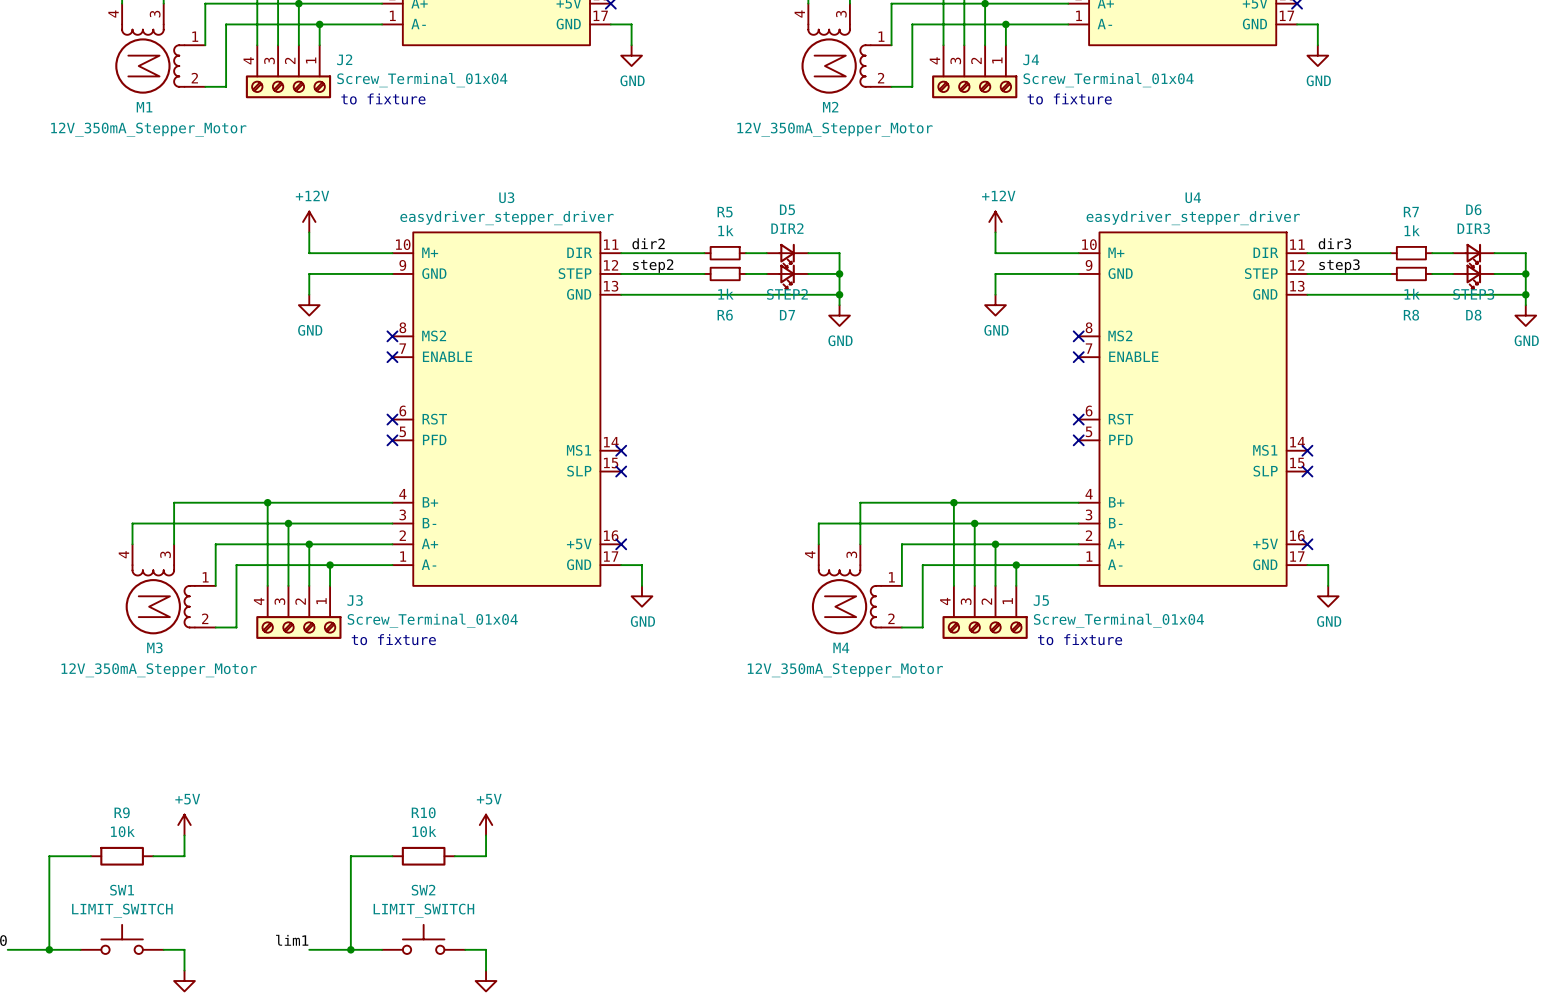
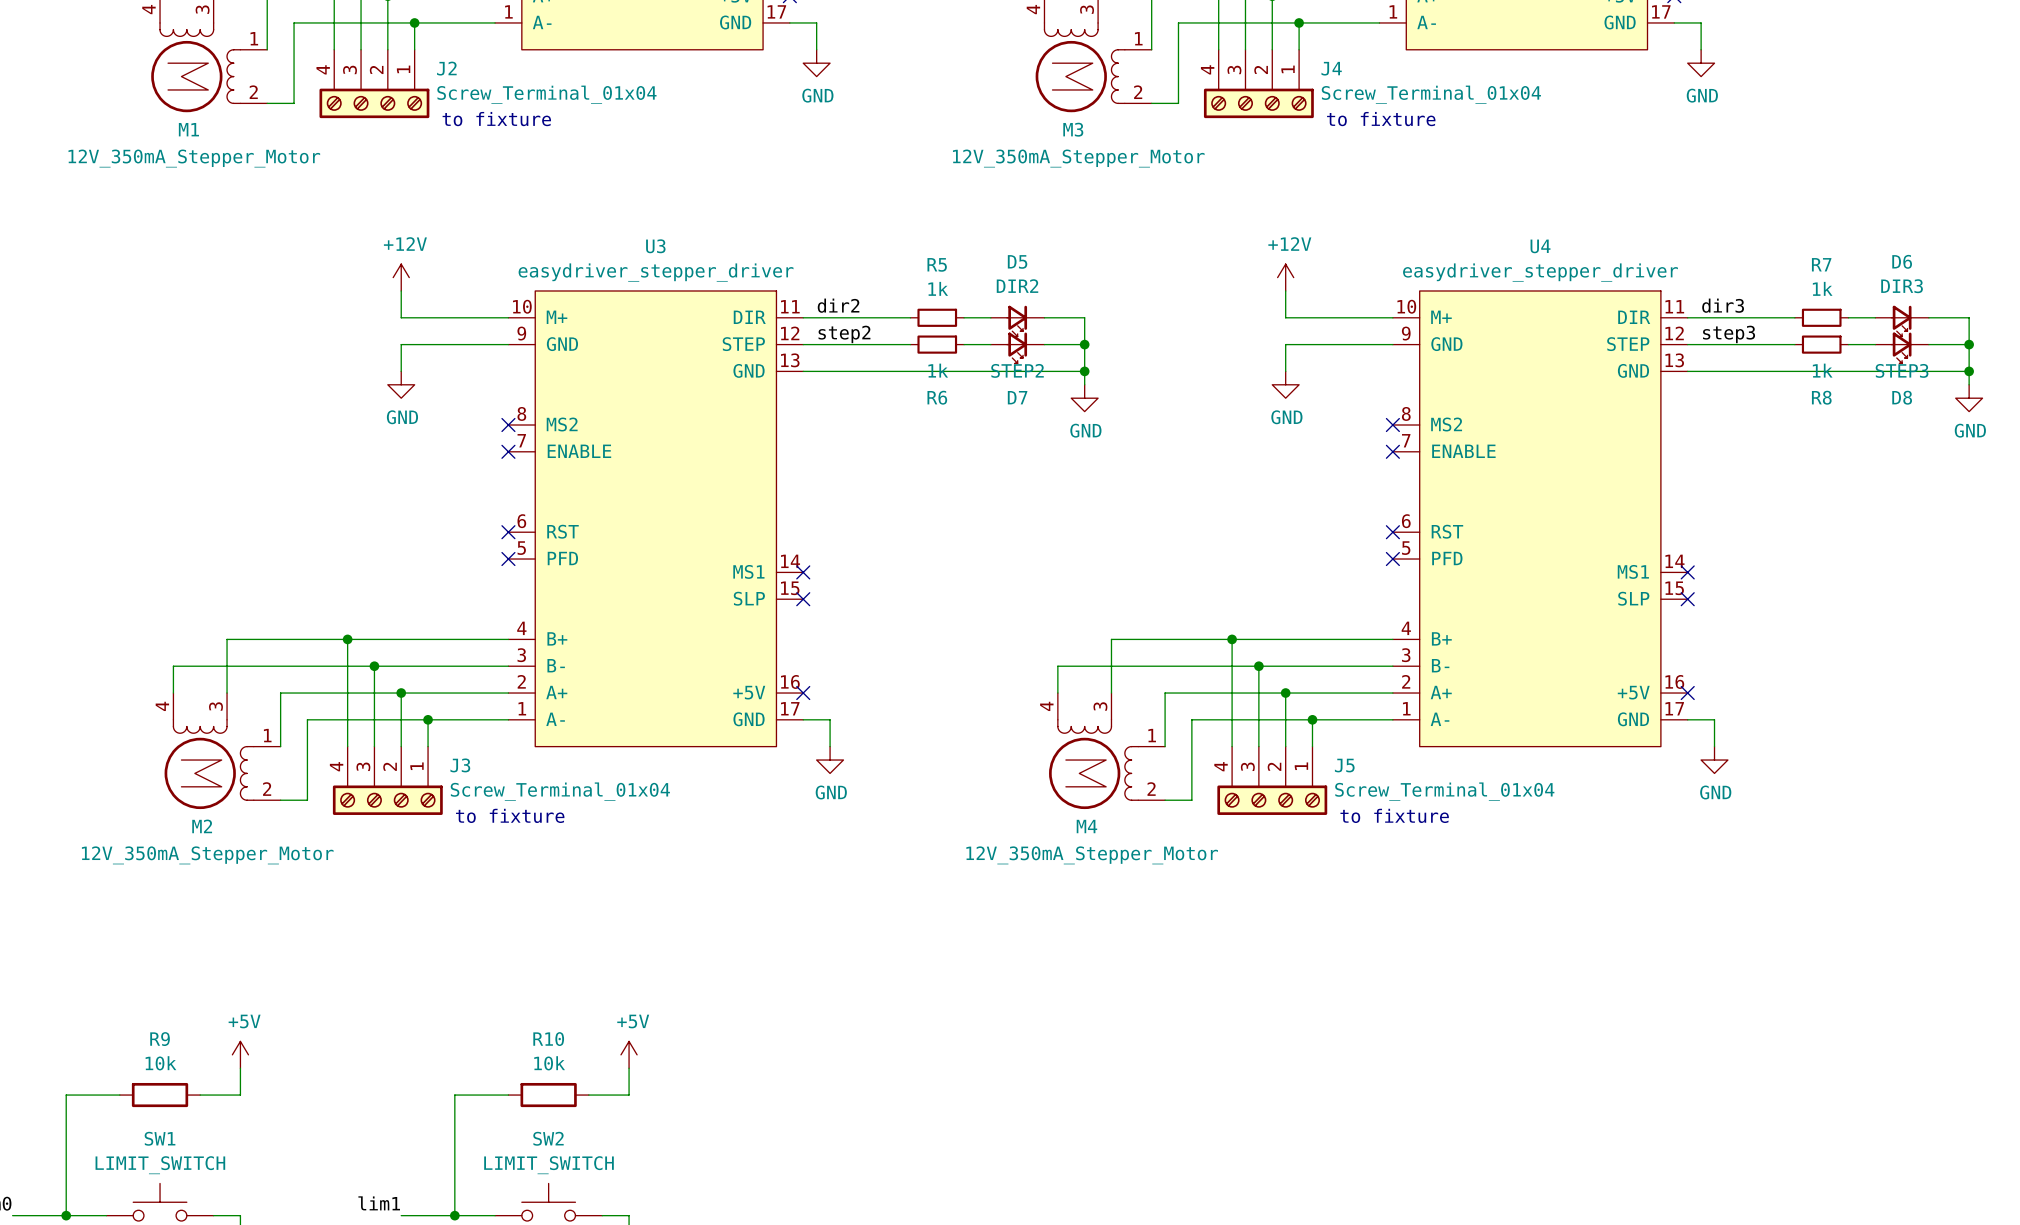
M2 name: M2 (830, 107) -> M3 (1073, 129)
M3 name: M3 (154, 647) -> M2 (202, 826)

